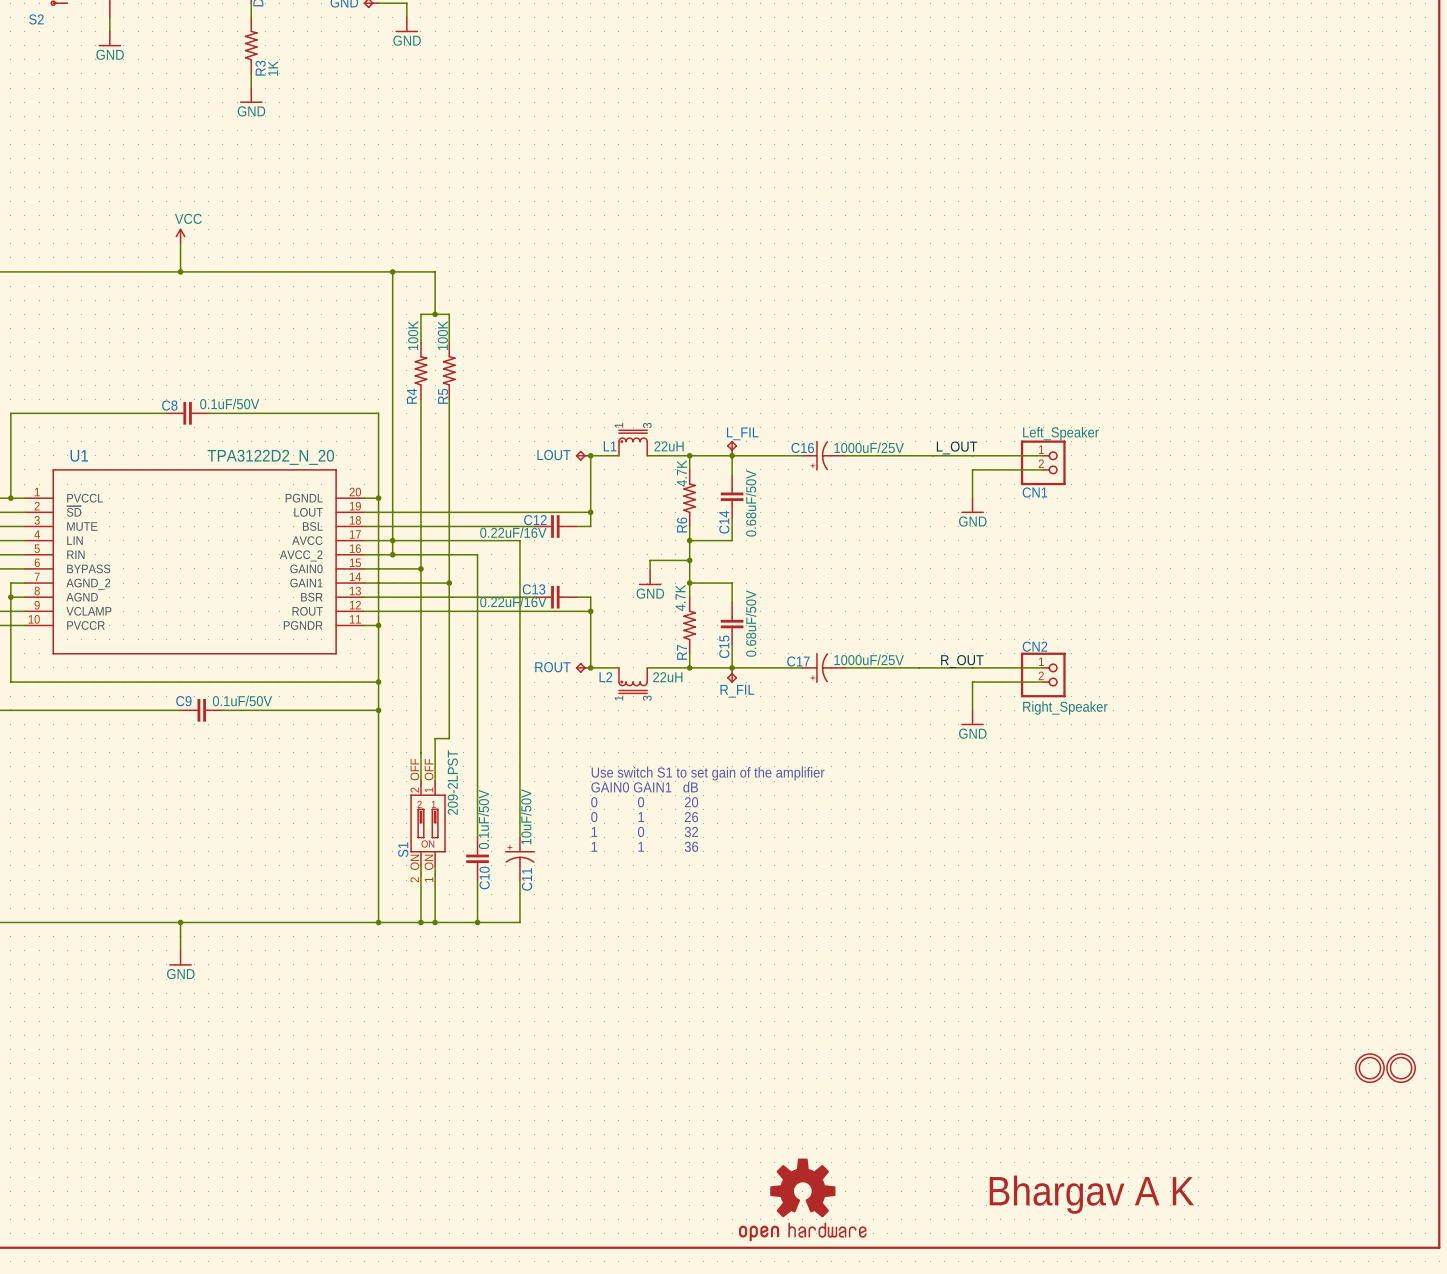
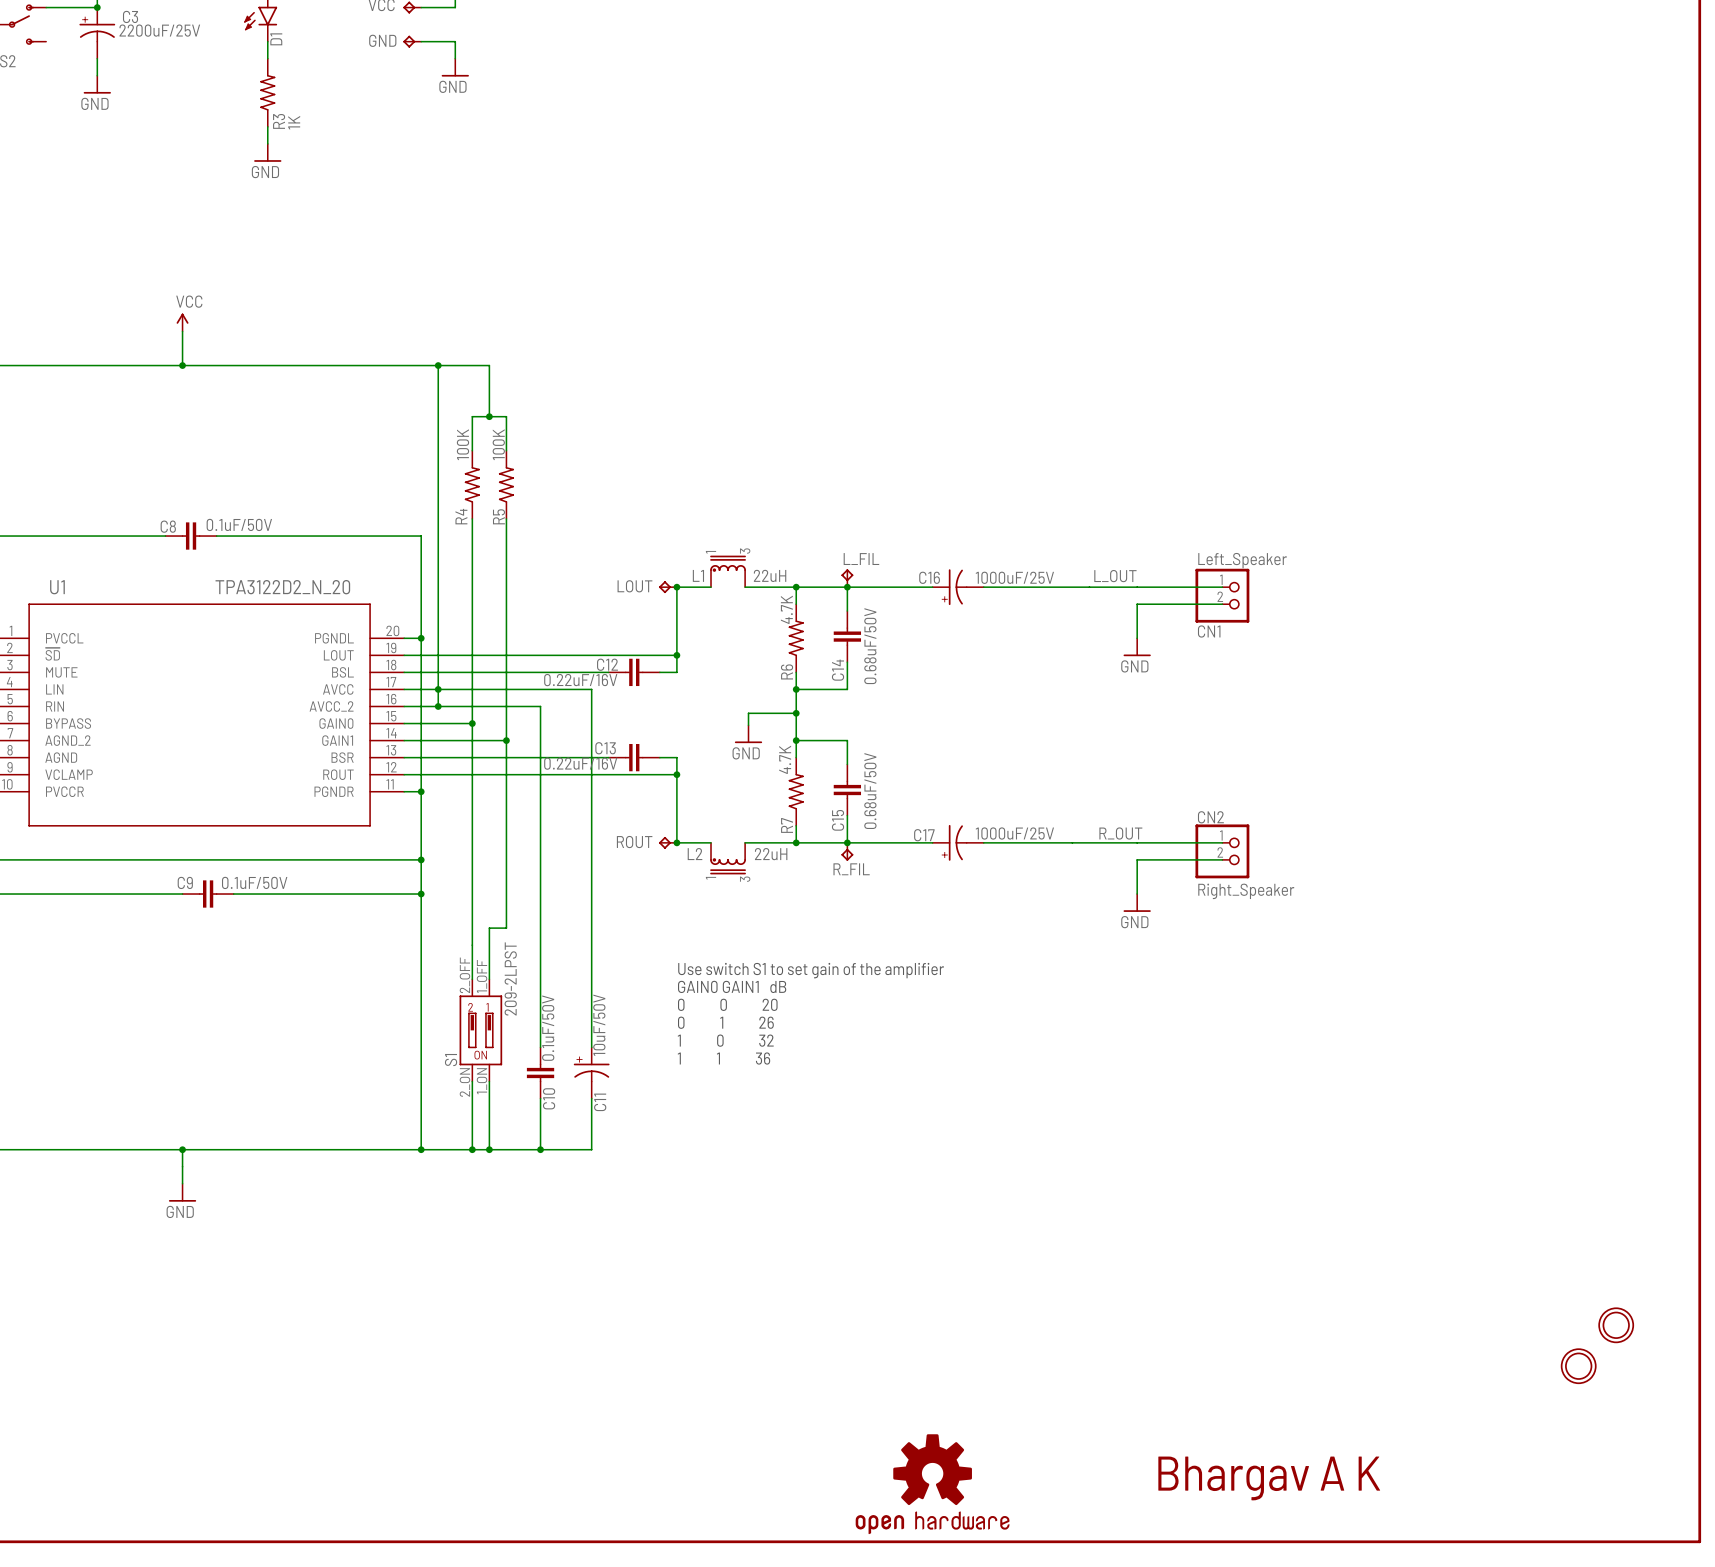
part position: (1401, 1068) -> (1578, 1366)

